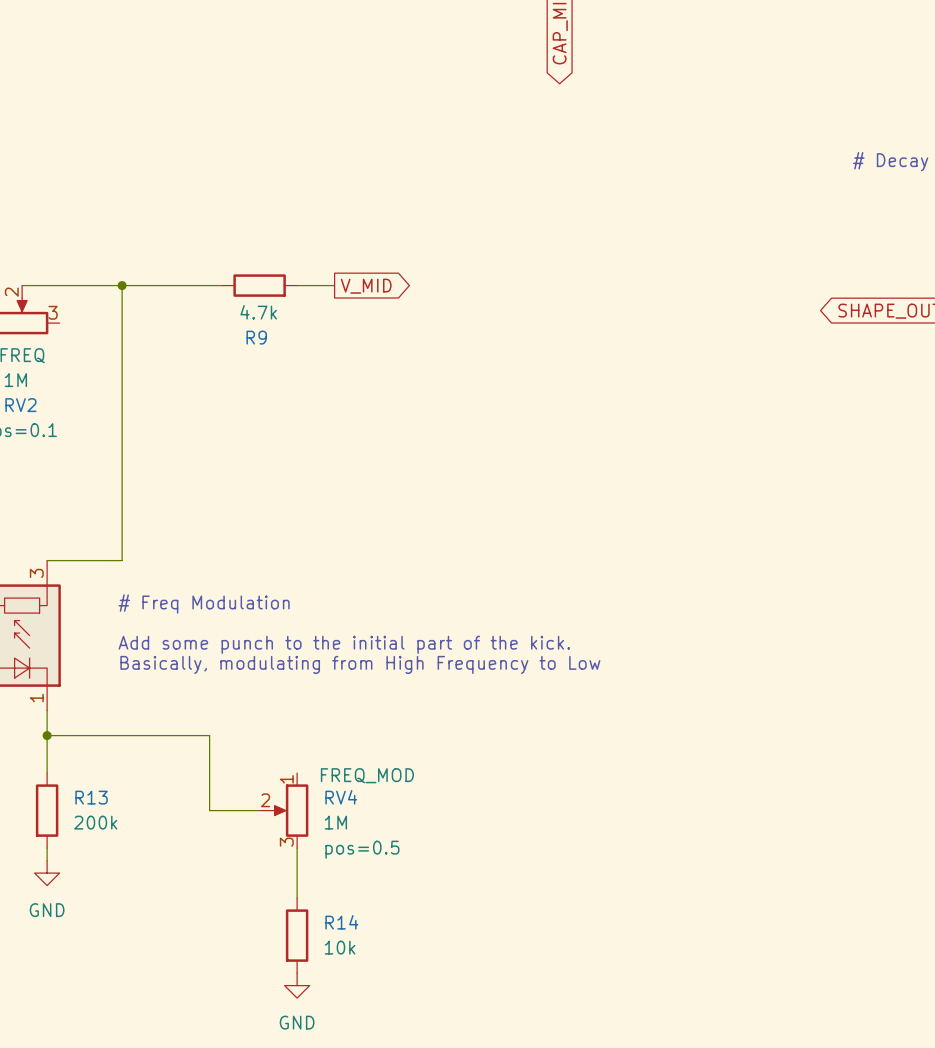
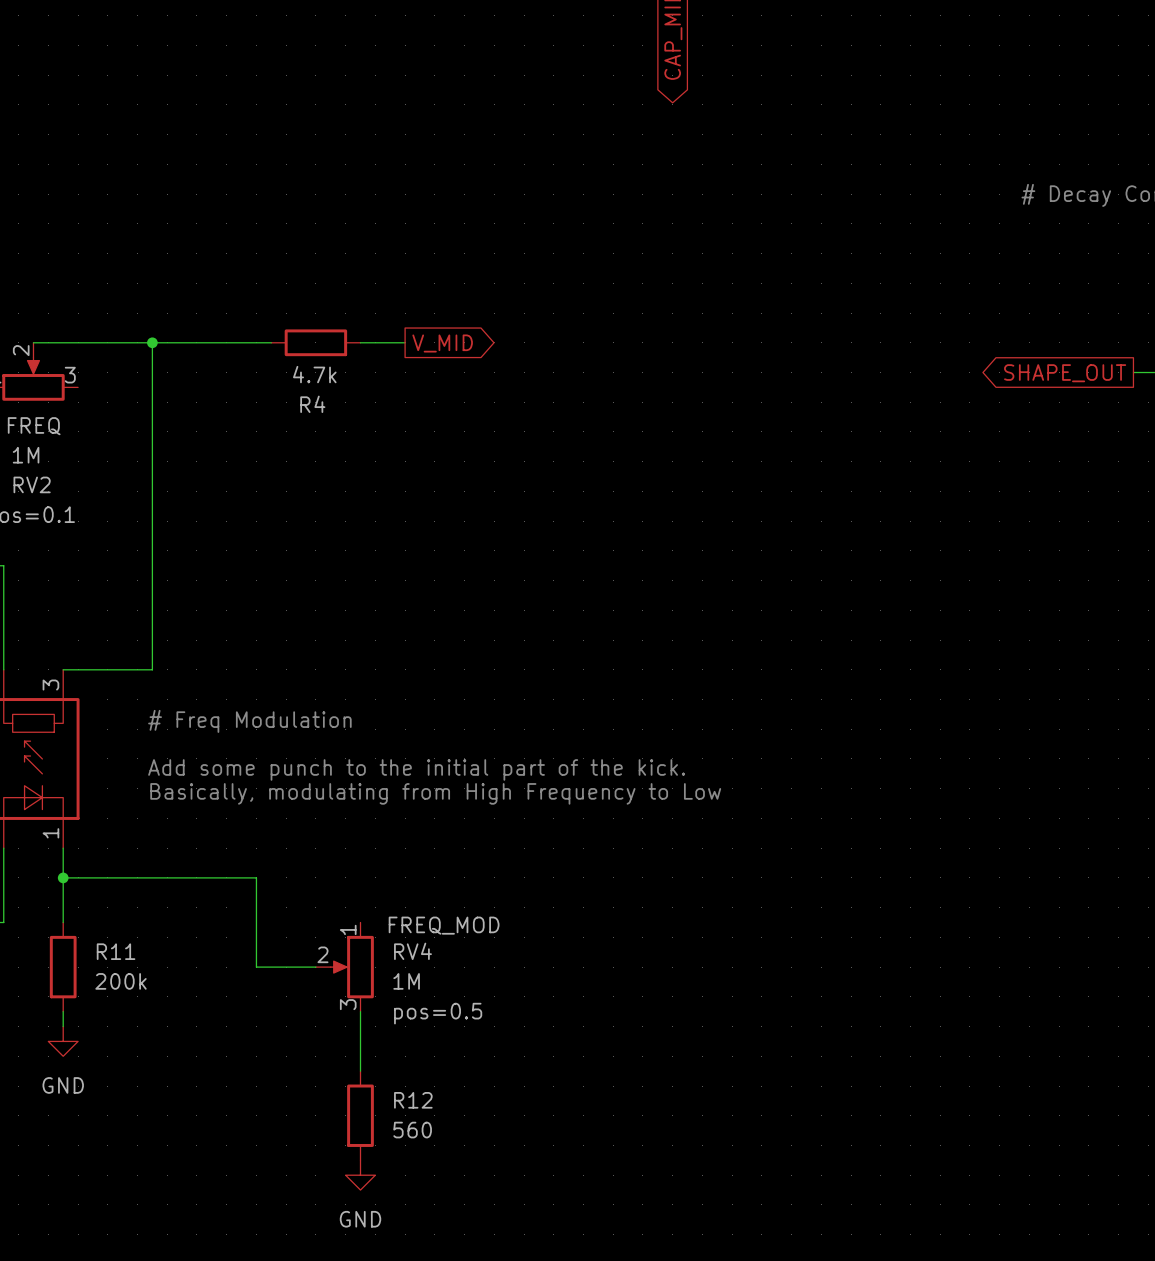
R9 name: R9 (256, 337) -> R4 (312, 404)
R13 name: R13 (91, 797) -> R11 (116, 951)
R14 name: R14 (341, 922) -> R12 (413, 1100)
R14 value: 10k (340, 947) -> 560 (412, 1130)

